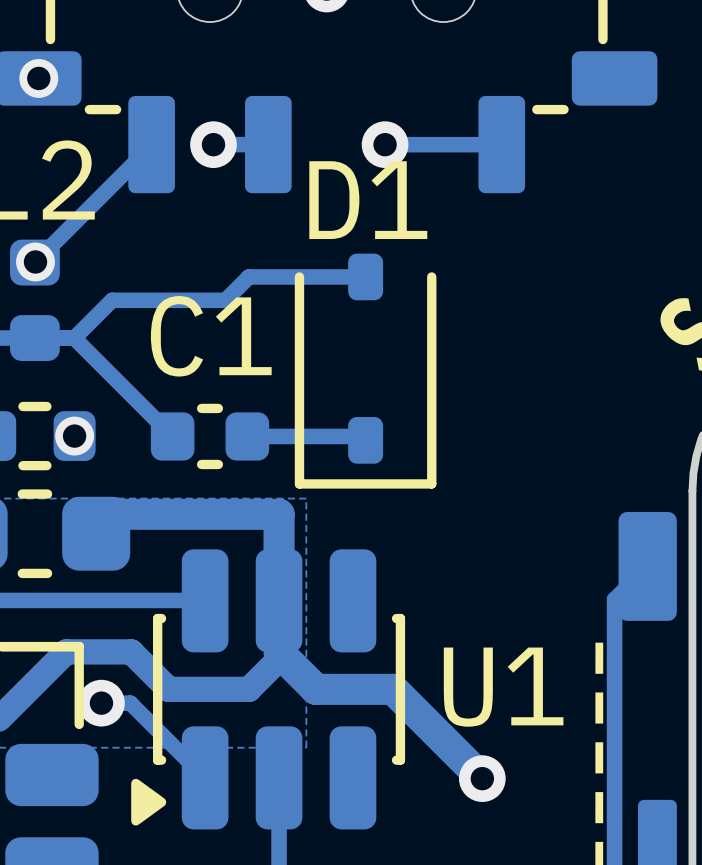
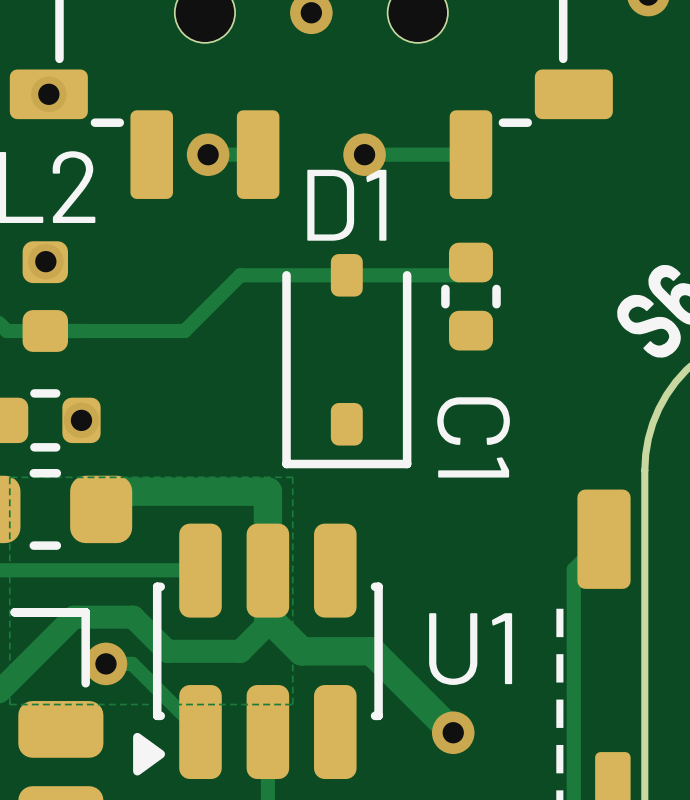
track: (151, 145) (35, 261) -> none
track: none -> (470, 262) (458, 275) (346, 275)
track: (225, 300) (112, 300) (74, 338) -> (219, 296) (184, 330) (81, 330)
C1 name position: C1 (211, 336) -> C1 (473, 437)
track: (74, 338) (172, 436) -> none
C1 rotation: 0° (209, 436) -> 90° clockwise (470, 296)
C1 position: (209, 436) -> (470, 296)
track: (247, 436) (361, 436) (365, 440) -> none

